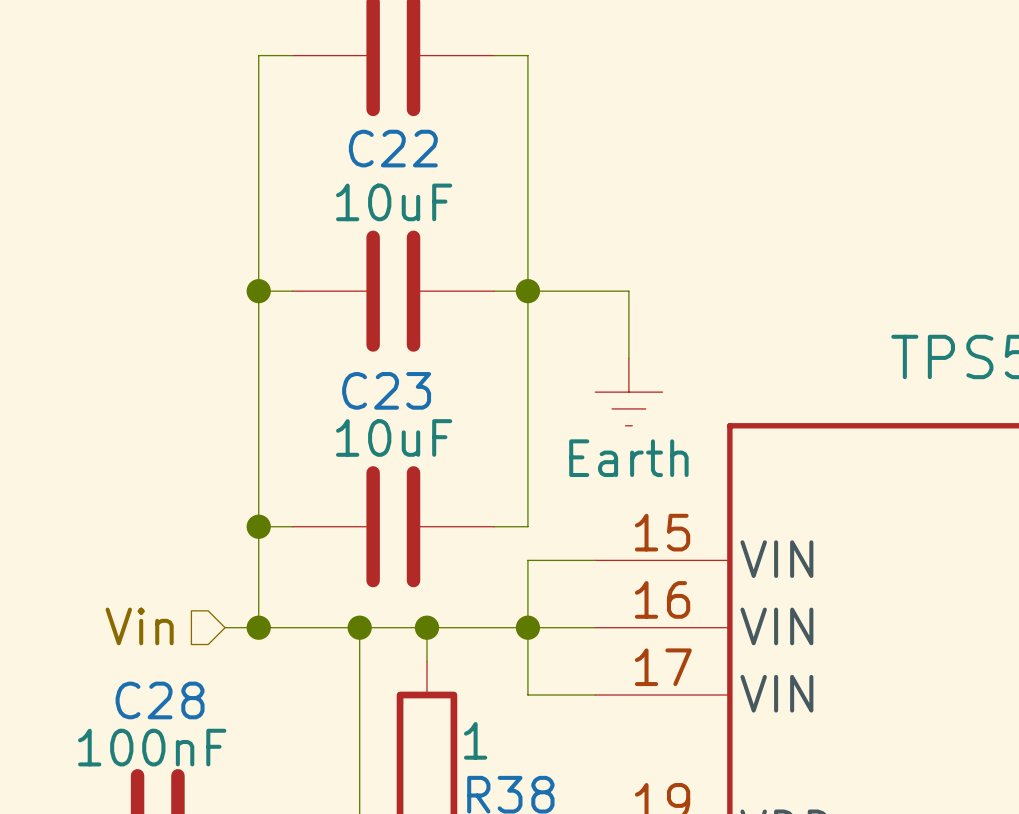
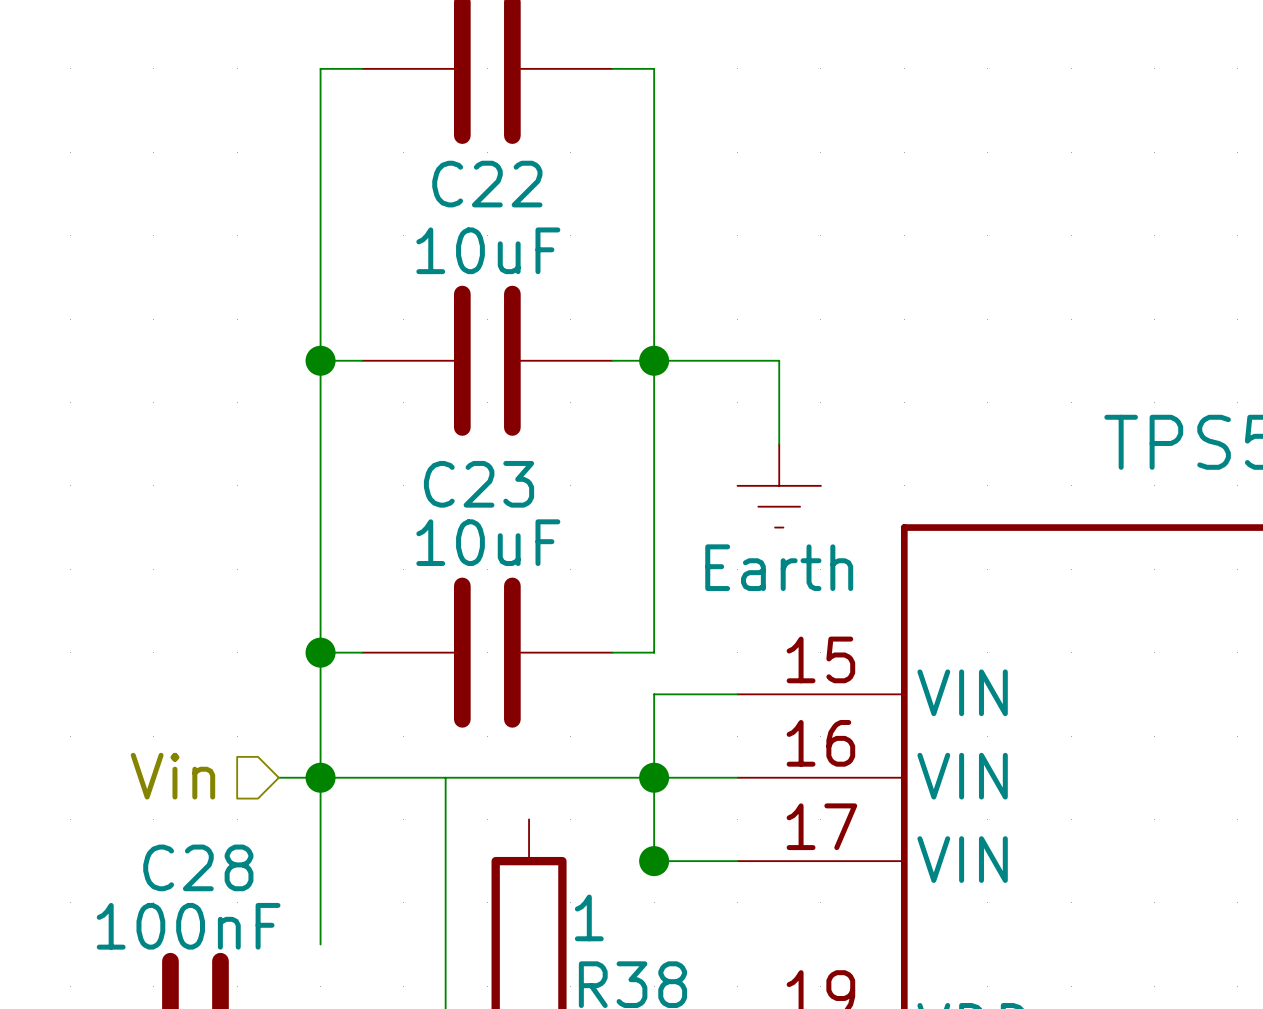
wire: none -> (320, 777) (320, 944)
junction: (359, 627) -> none
wire: (426, 627) (426, 661) -> none
junction: (426, 627) -> none
junction: none -> (654, 861)

